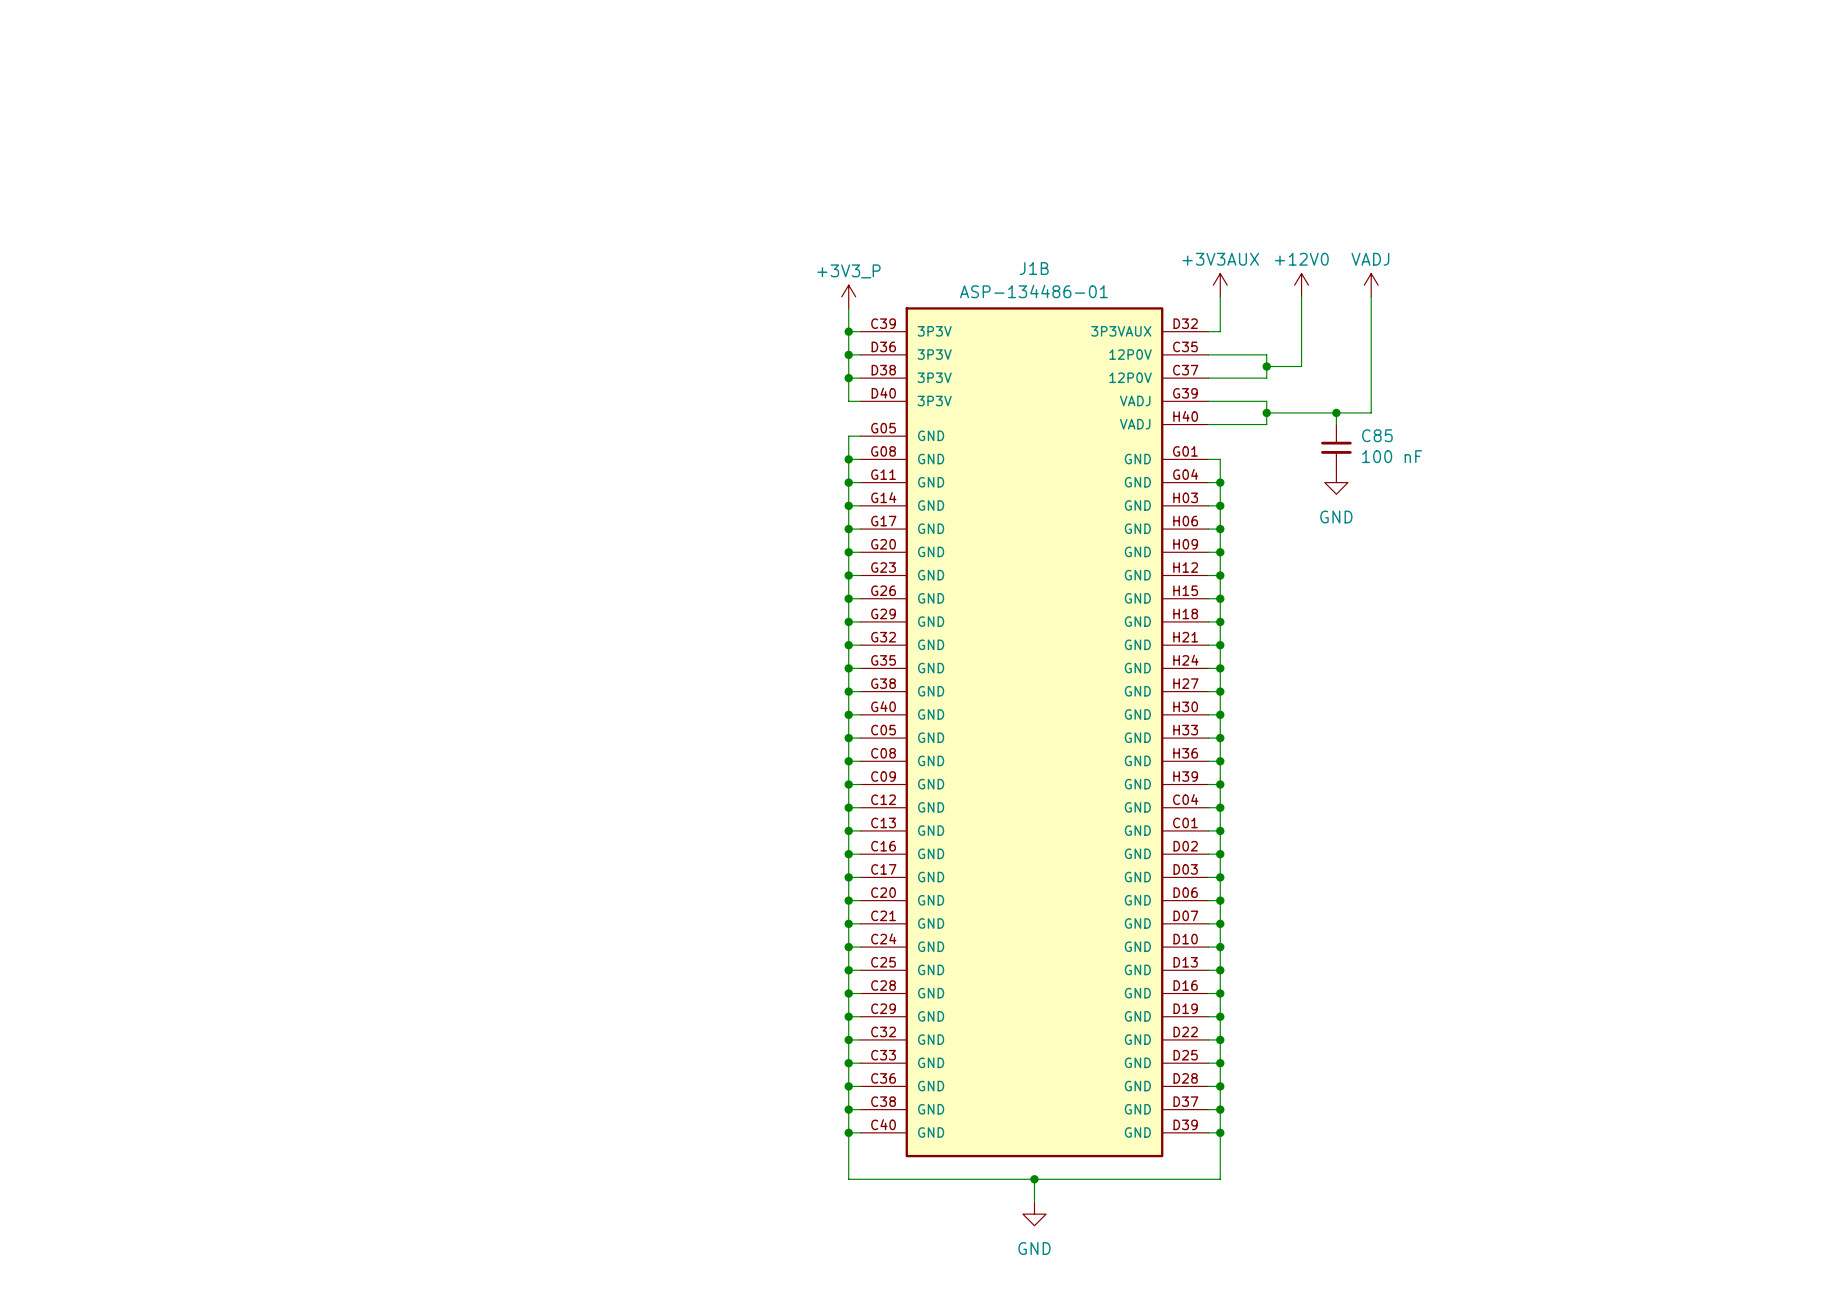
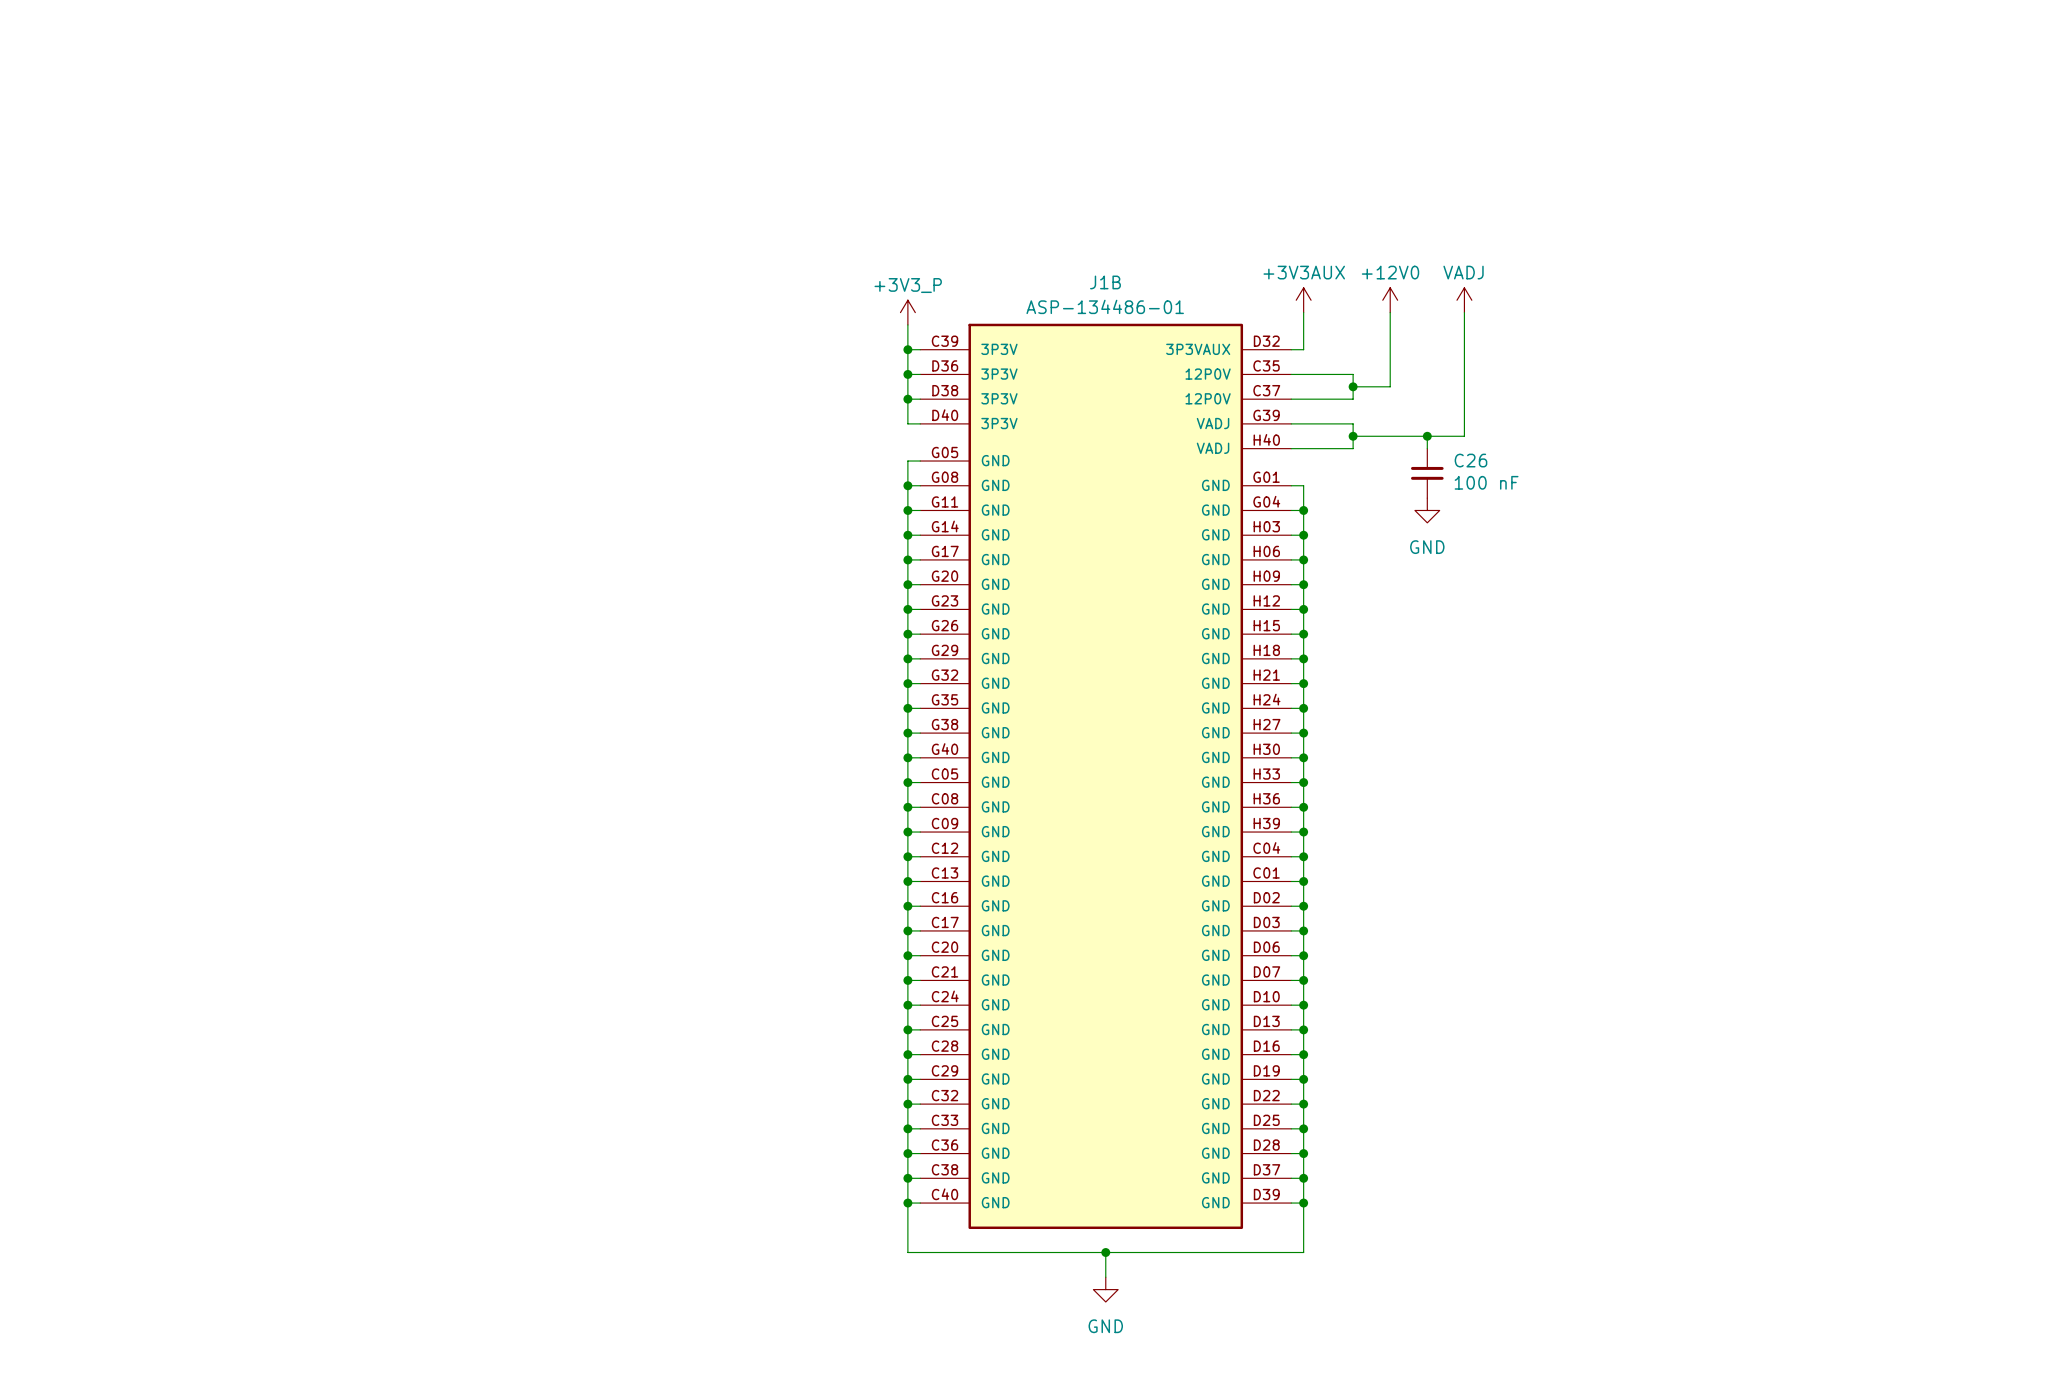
C85 name: C85 (1377, 435) -> C26 (1470, 460)

